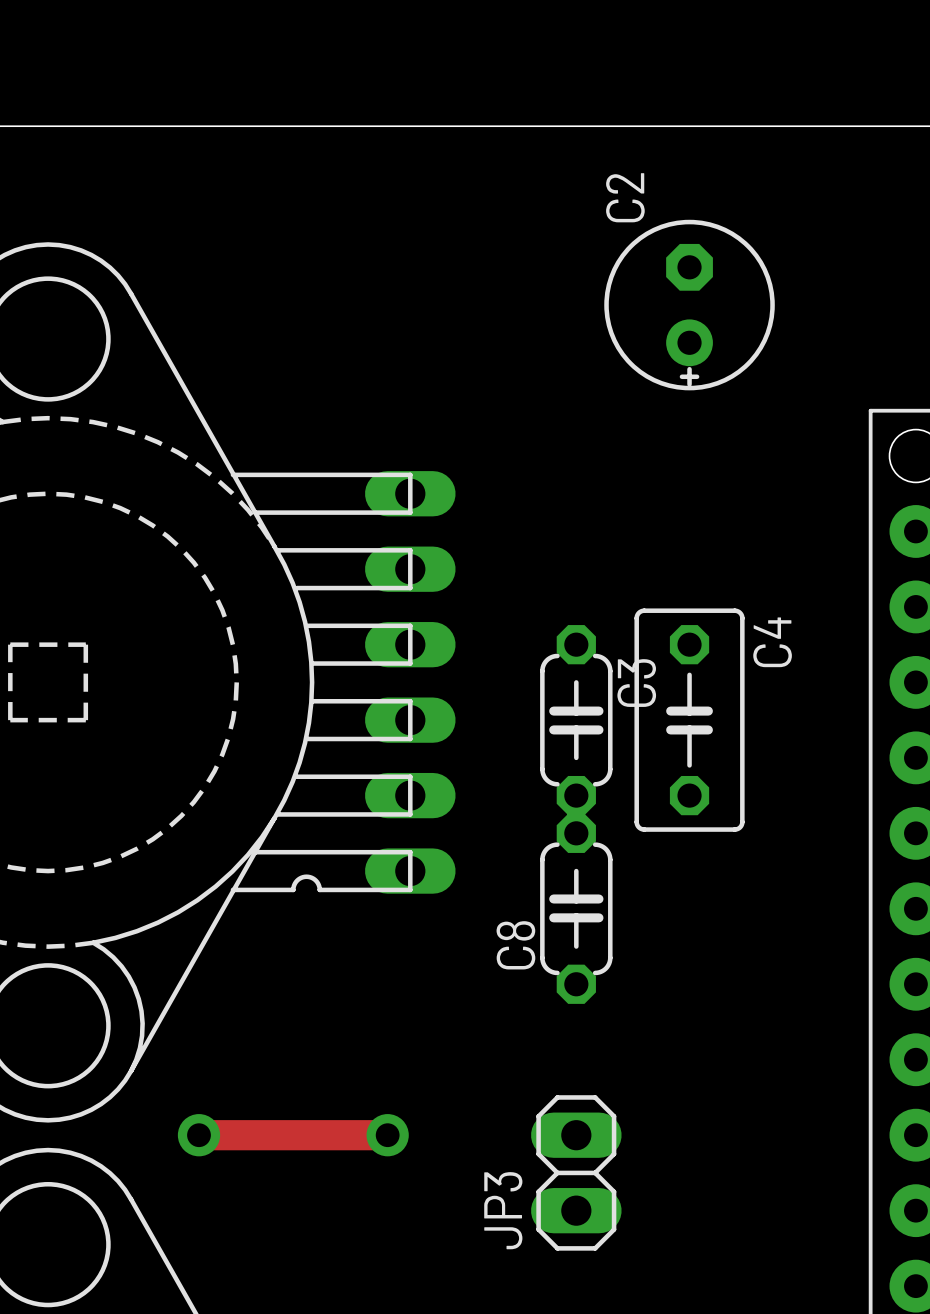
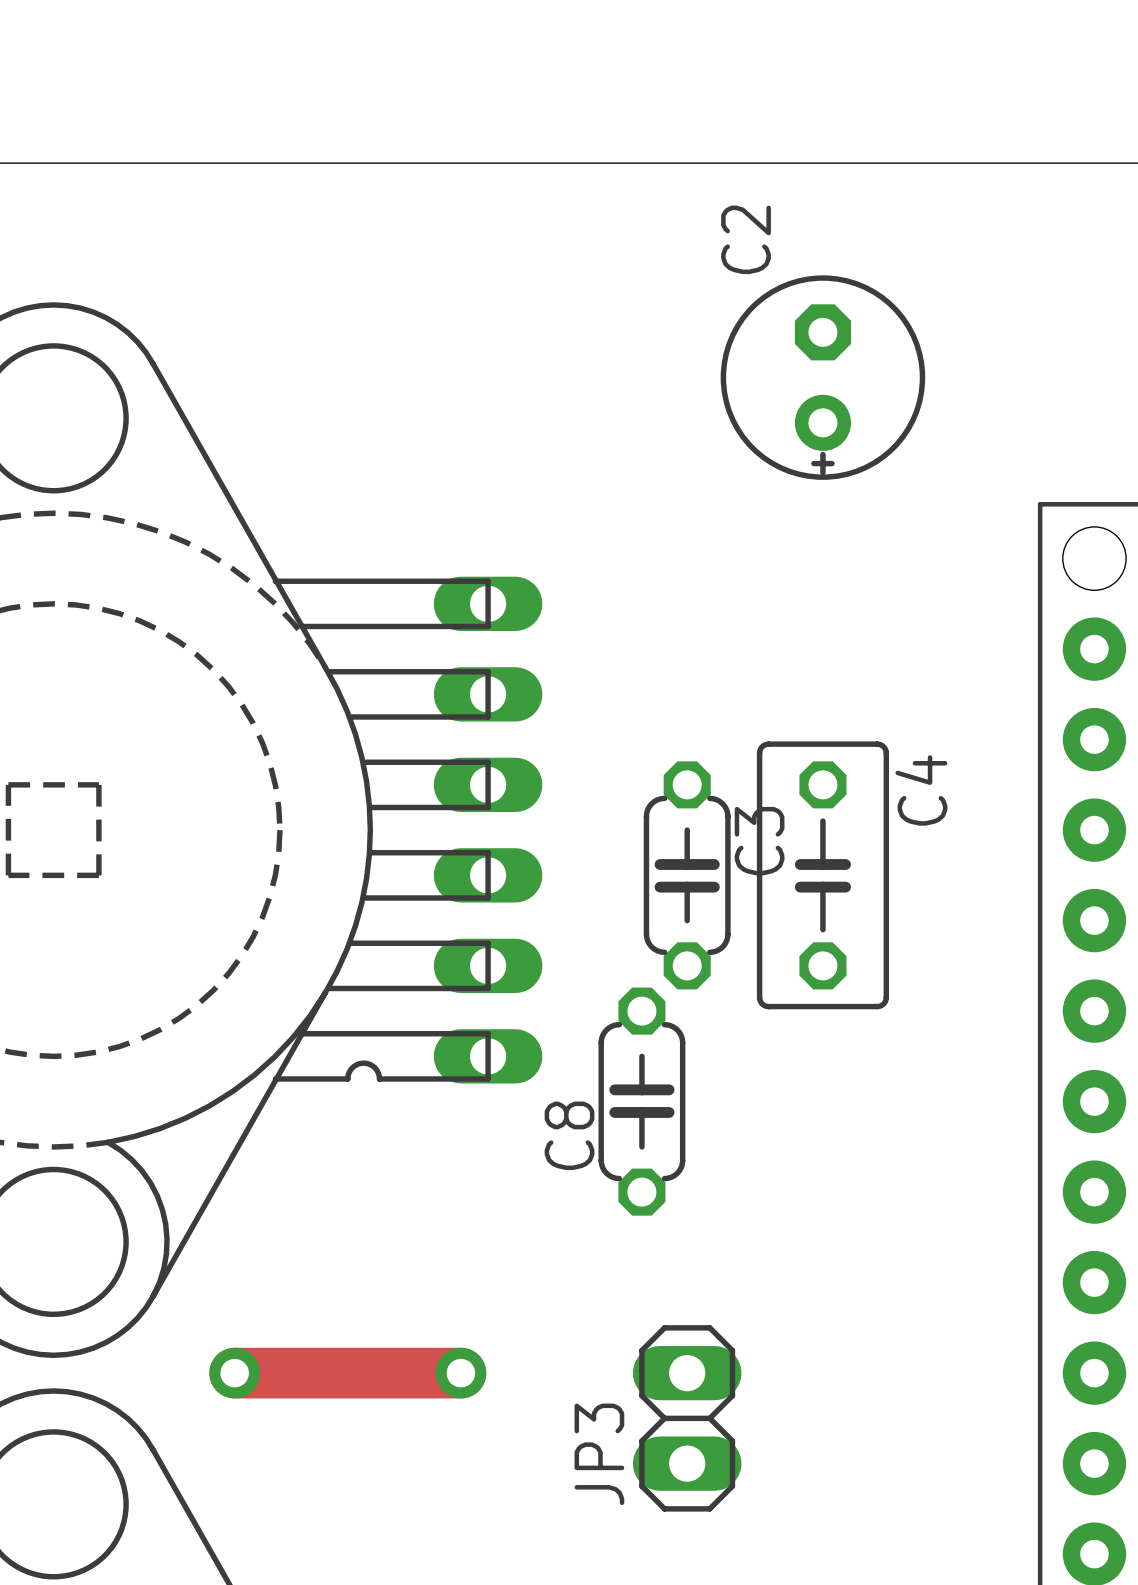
C8 position: (576, 908) -> (641, 1101)
track width: thin (198, 1135) (387, 1135) -> thick (234, 1373) (460, 1373)

